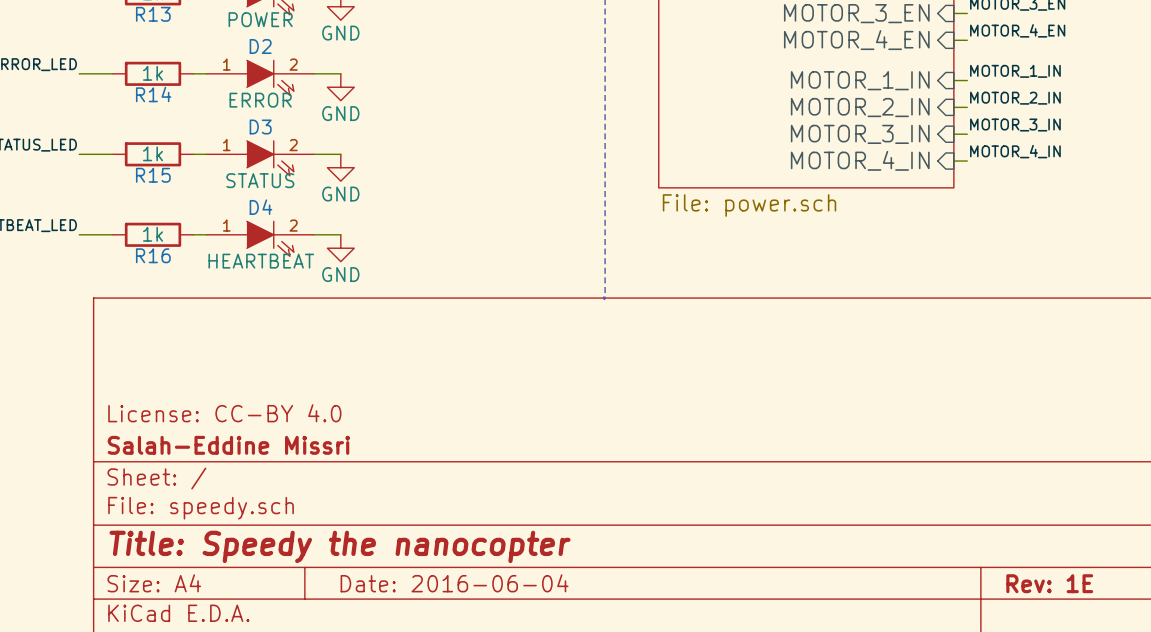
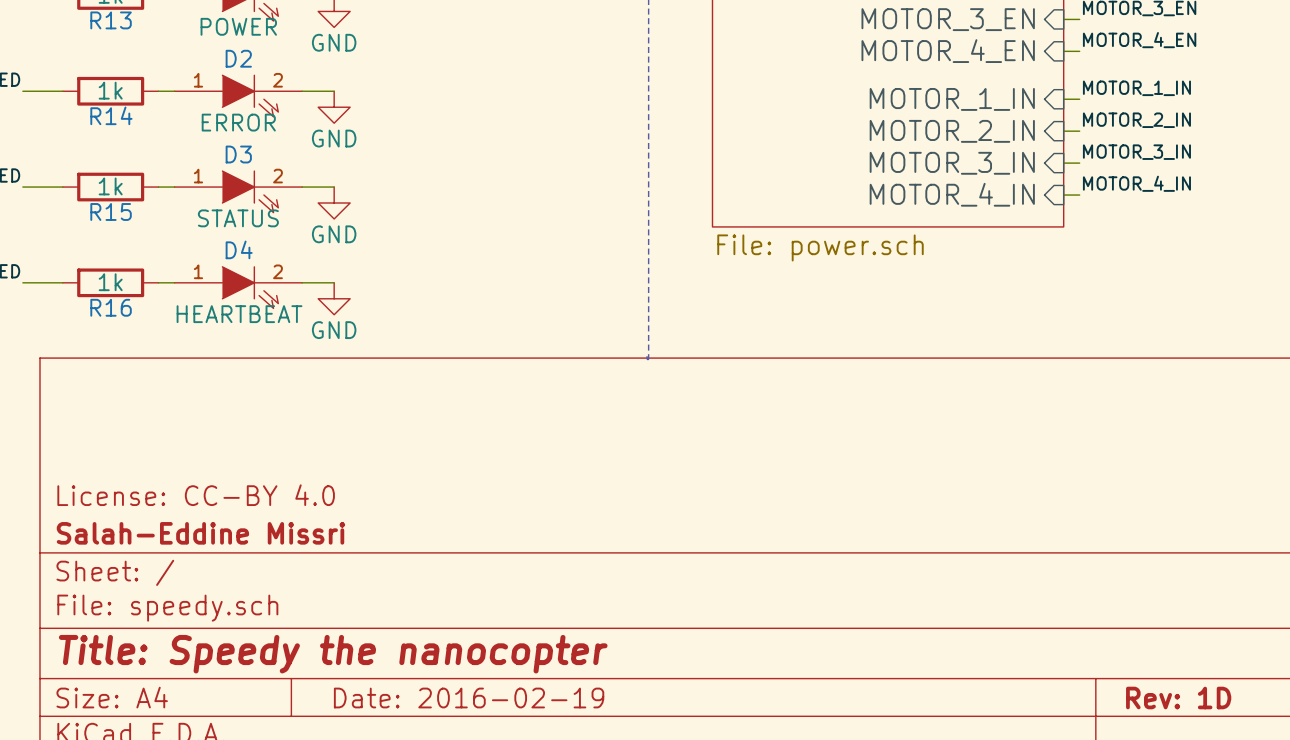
title block: Date: 2016-06-04 (454, 583) -> Date: 2016-02-19 (469, 698)
title block: Rev: 1E (1049, 583) -> Rev: 1D (1178, 698)

